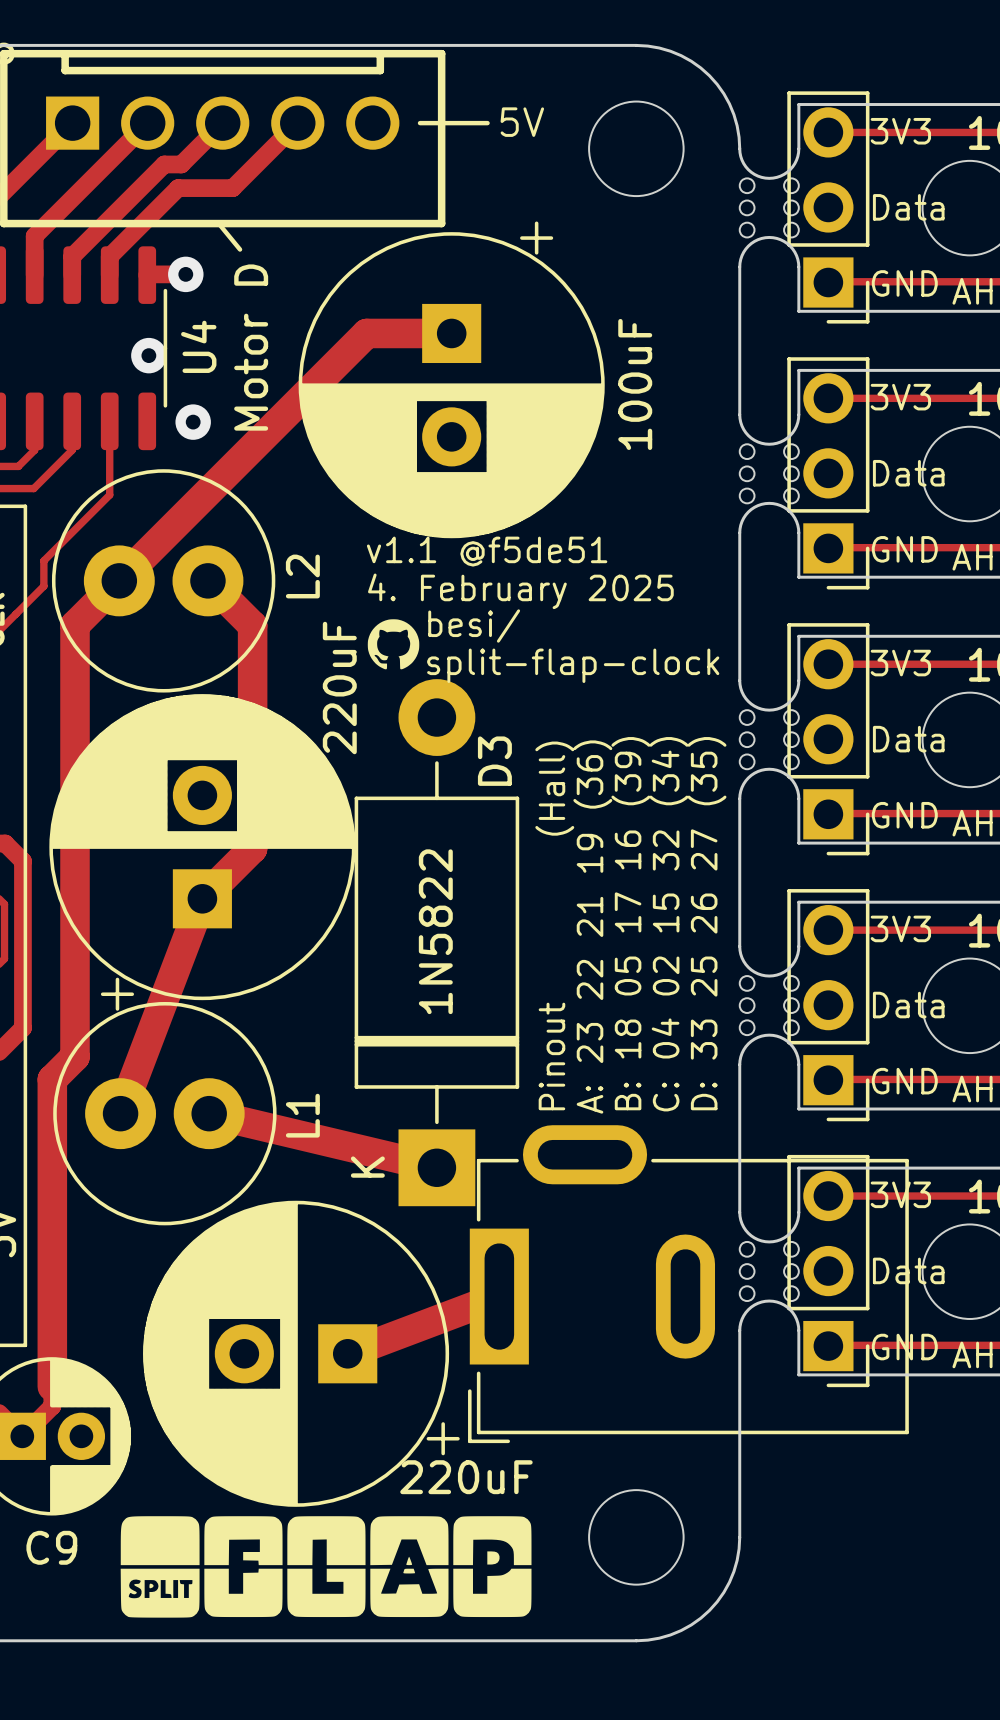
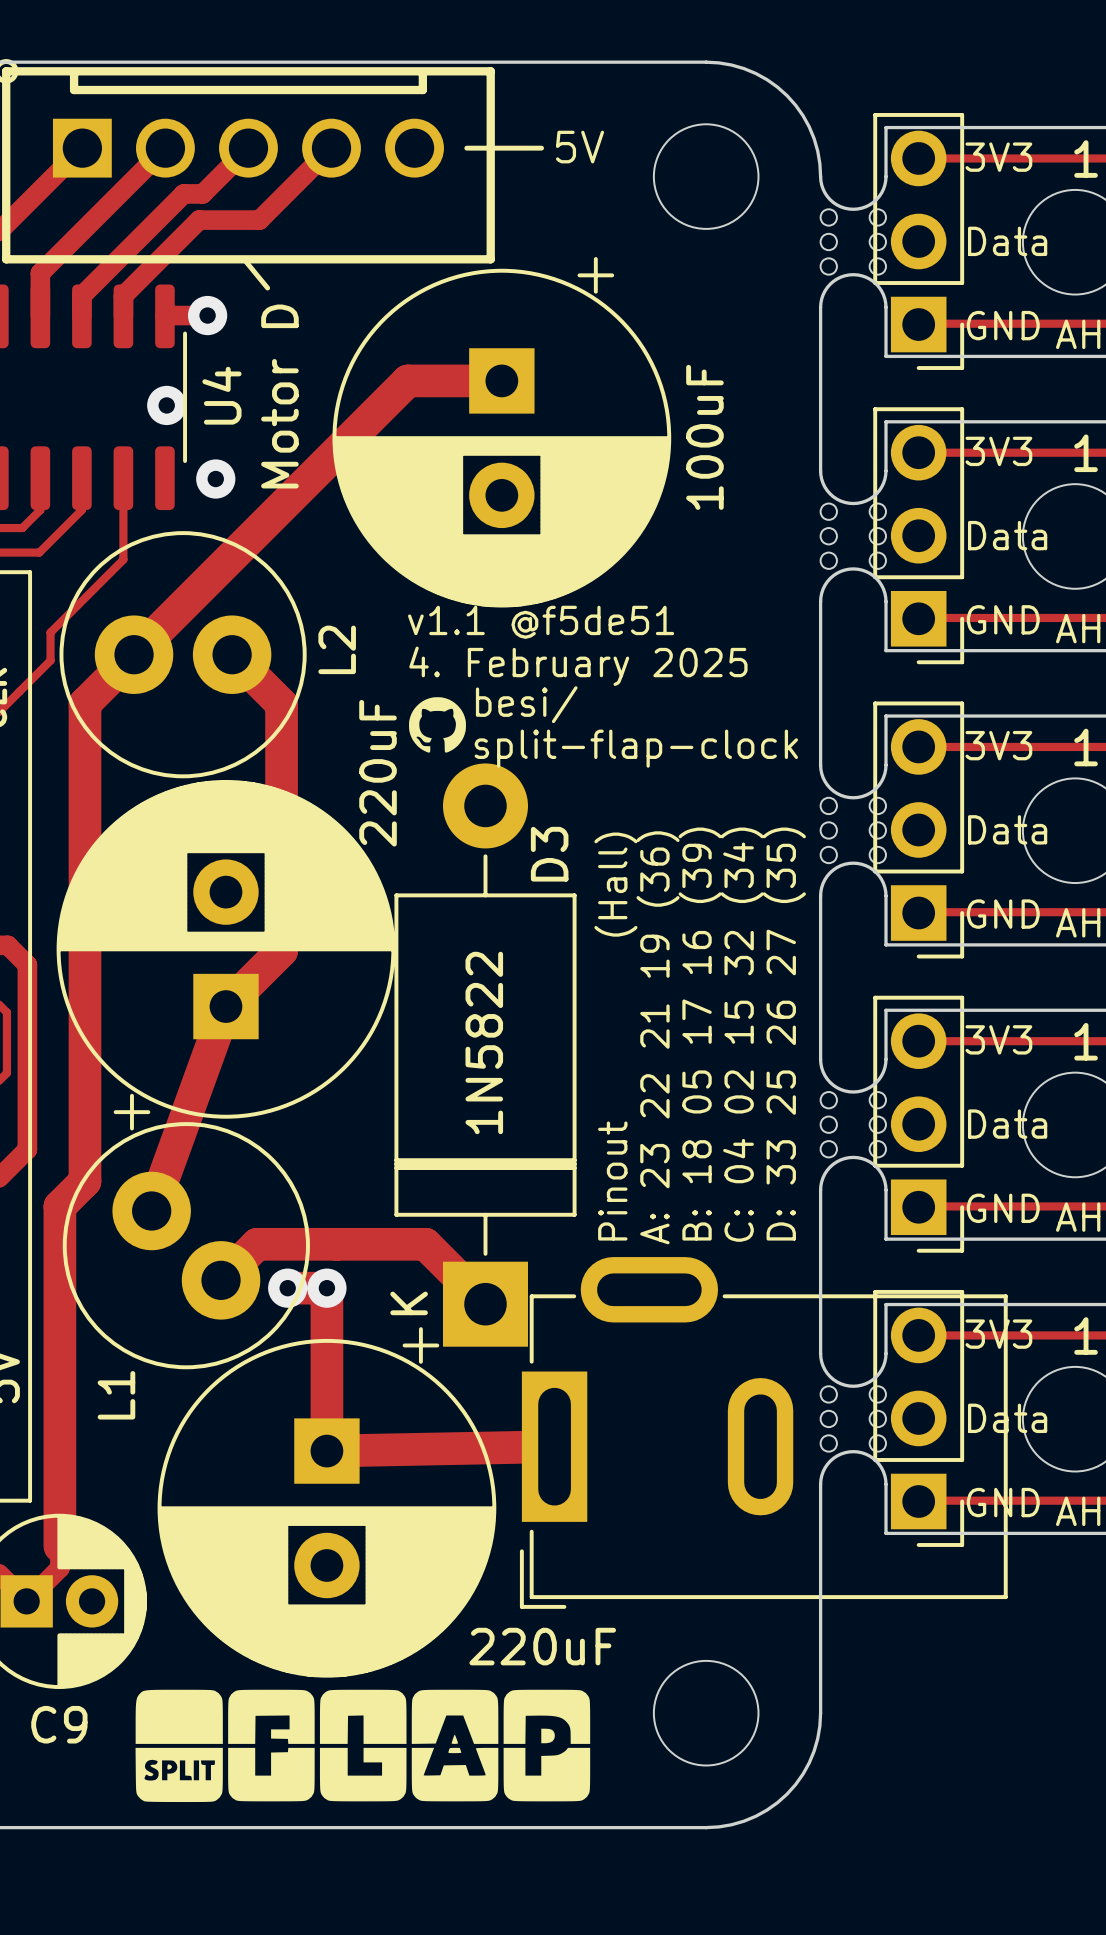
track: (202, 898) (120, 1113) -> (225, 1006) (151, 1211)
L1 rotation: 0° (164, 1113) -> 45° clockwise (186, 1245)
track: (209, 1113) (436, 1167) -> (221, 1280) (257, 1244) (425, 1244) (485, 1304)
L1 name position: L1 (302, 1115) -> L1 (116, 1395)
via: none -> (287, 1288)
via: none -> (326, 1288)
track: (499, 1296) (347, 1353) -> (554, 1446) (326, 1451) (326, 1288) (287, 1288)
part rotation: 0° (301, 1353) -> 90° counterclockwise (326, 1502)

